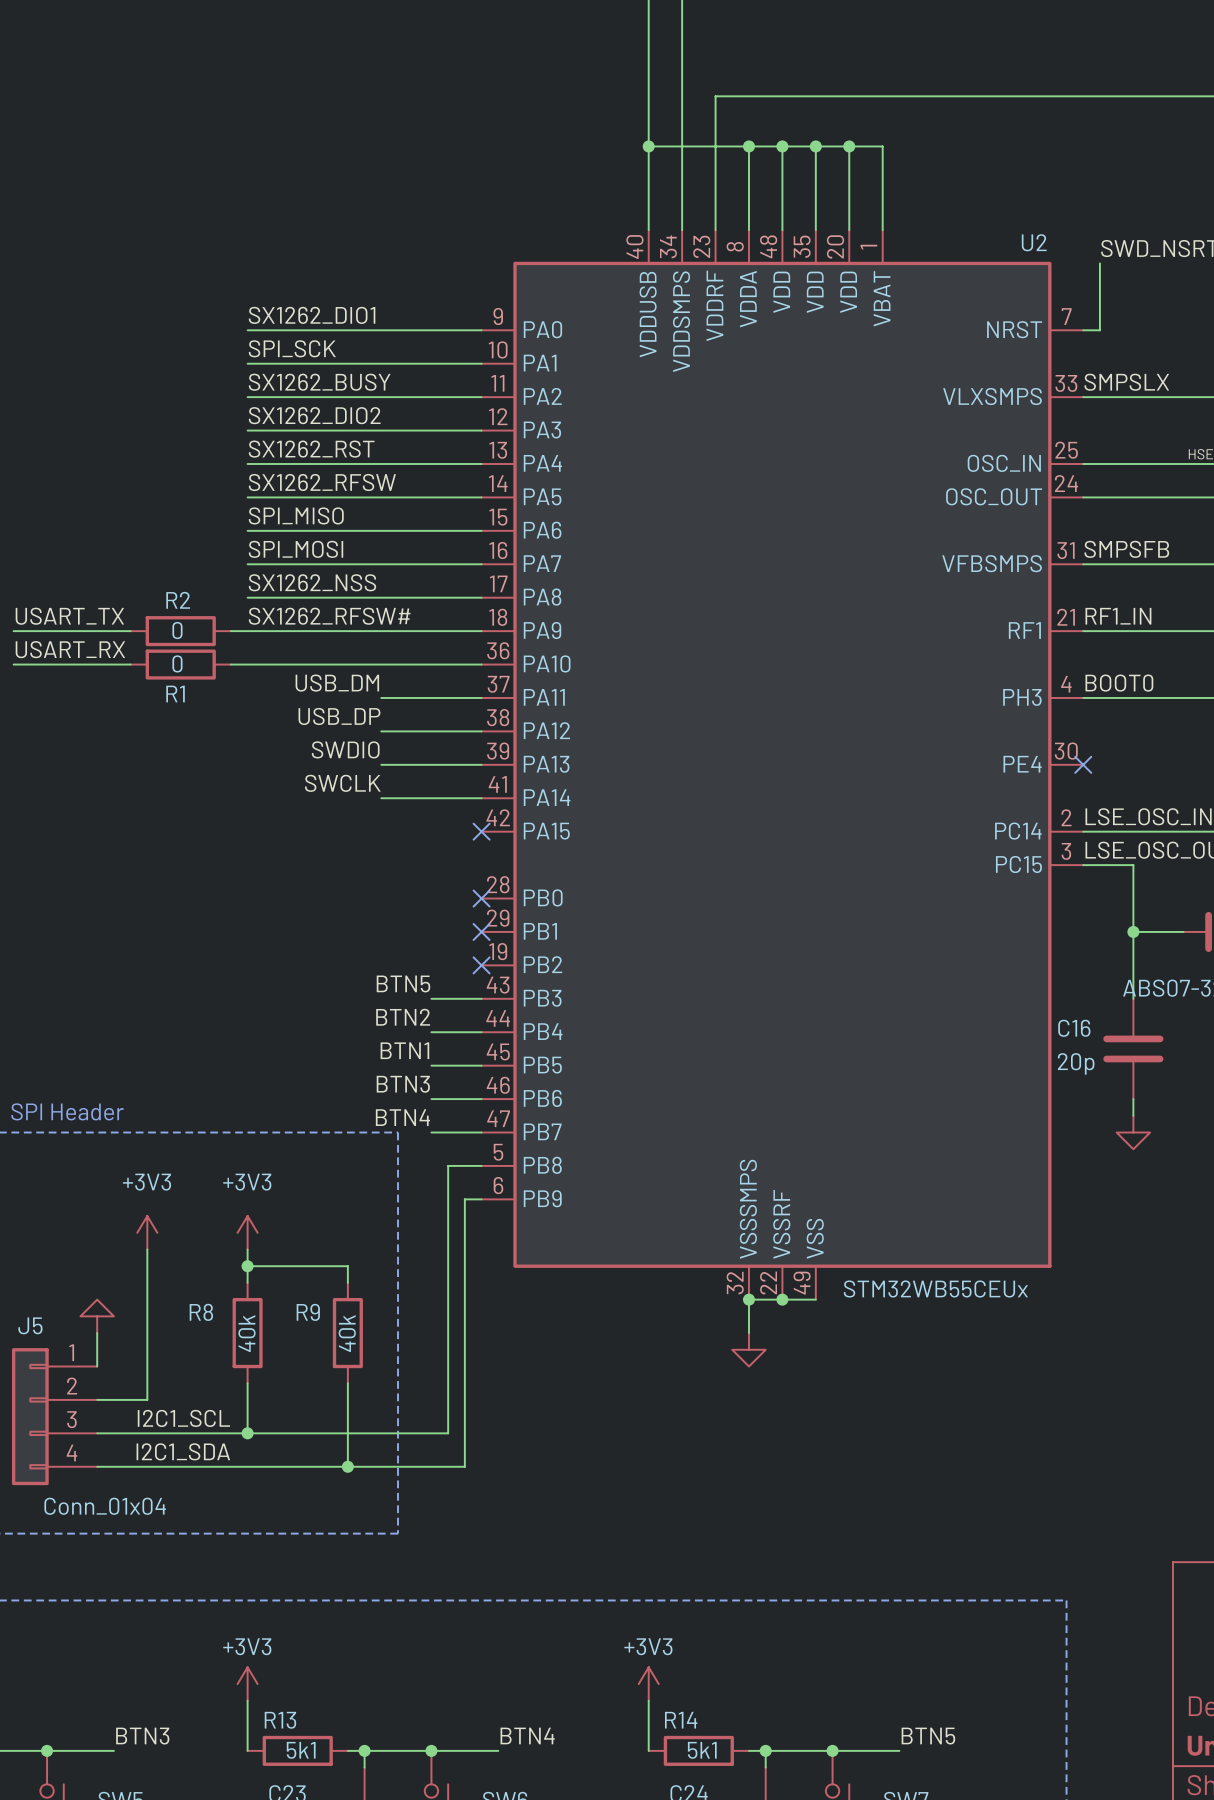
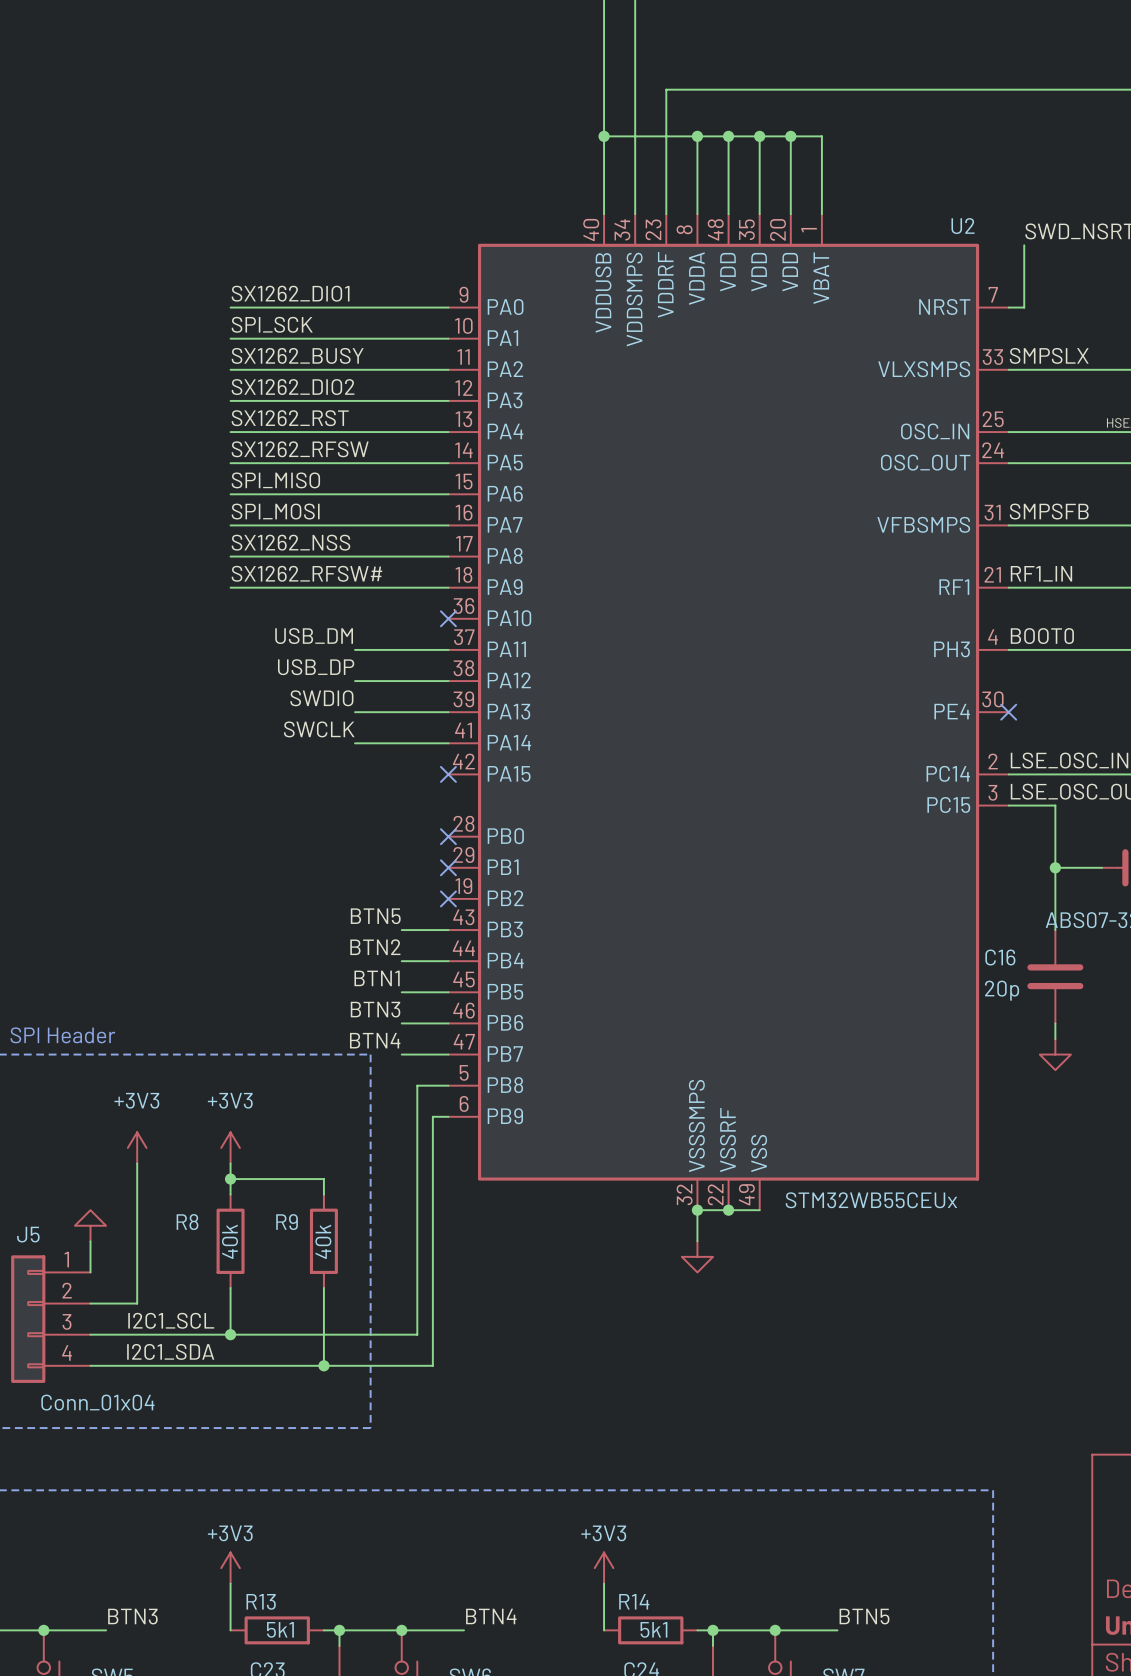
label: USART_TX (69, 616) -> none
wire: (13, 631) (130, 631) -> none
R2: 0 (180, 631) -> none
wire: (230, 631) (247, 631) -> none
label: USART_RX (70, 649) -> none
wire: (13, 664) (130, 664) -> none
R1: 0 (180, 664) -> none
wire: (230, 664) (481, 664) -> none
no-connect mark: none -> (448, 618)

